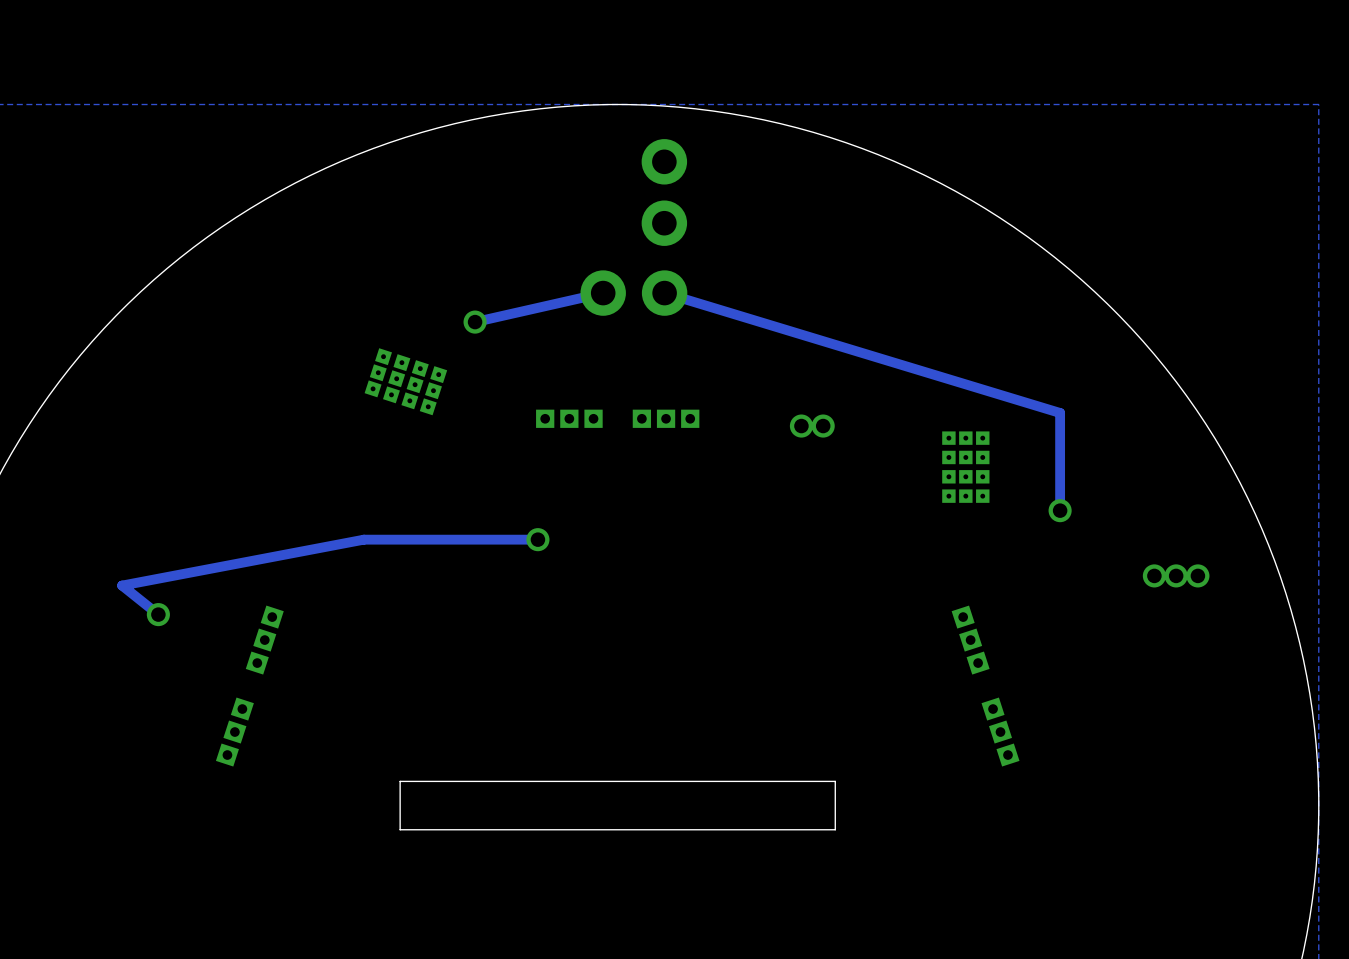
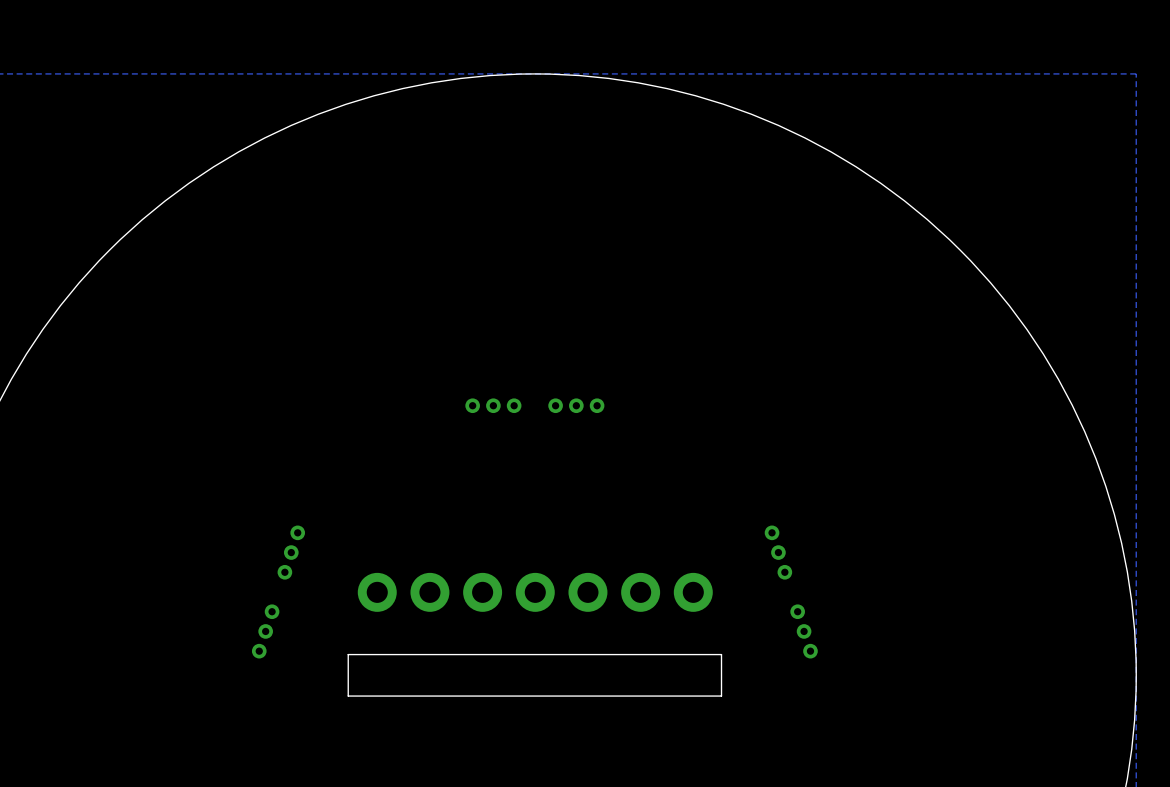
part: (664, 192) -> none
track: (603, 293) (475, 322) -> none
part: (633, 293) -> none
track: (664, 293) (1060, 412) (1060, 510) -> none
via: (475, 322) -> none
part: (405, 381) -> none
part: (569, 418) -> none
part: (666, 418) -> none
via: (801, 426) -> none
via: (823, 426) -> none
part: (965, 467) -> none
part: none -> (493, 405)
part: none -> (576, 405)
via: (1060, 510) -> none
track: (537, 539) (363, 539) (122, 585) (158, 614) -> none
via: (537, 539) -> none
via: (1154, 575) -> none
via: (1176, 575) -> none
via: (1197, 575) -> none
via: (158, 614) -> none
part: (264, 640) -> none
part: (970, 640) -> none
part: none -> (291, 552)
part: none -> (778, 552)
part: none -> (535, 592)
part: (234, 732) -> none
part: (1000, 732) -> none
part: none -> (265, 631)
part: none -> (804, 631)

